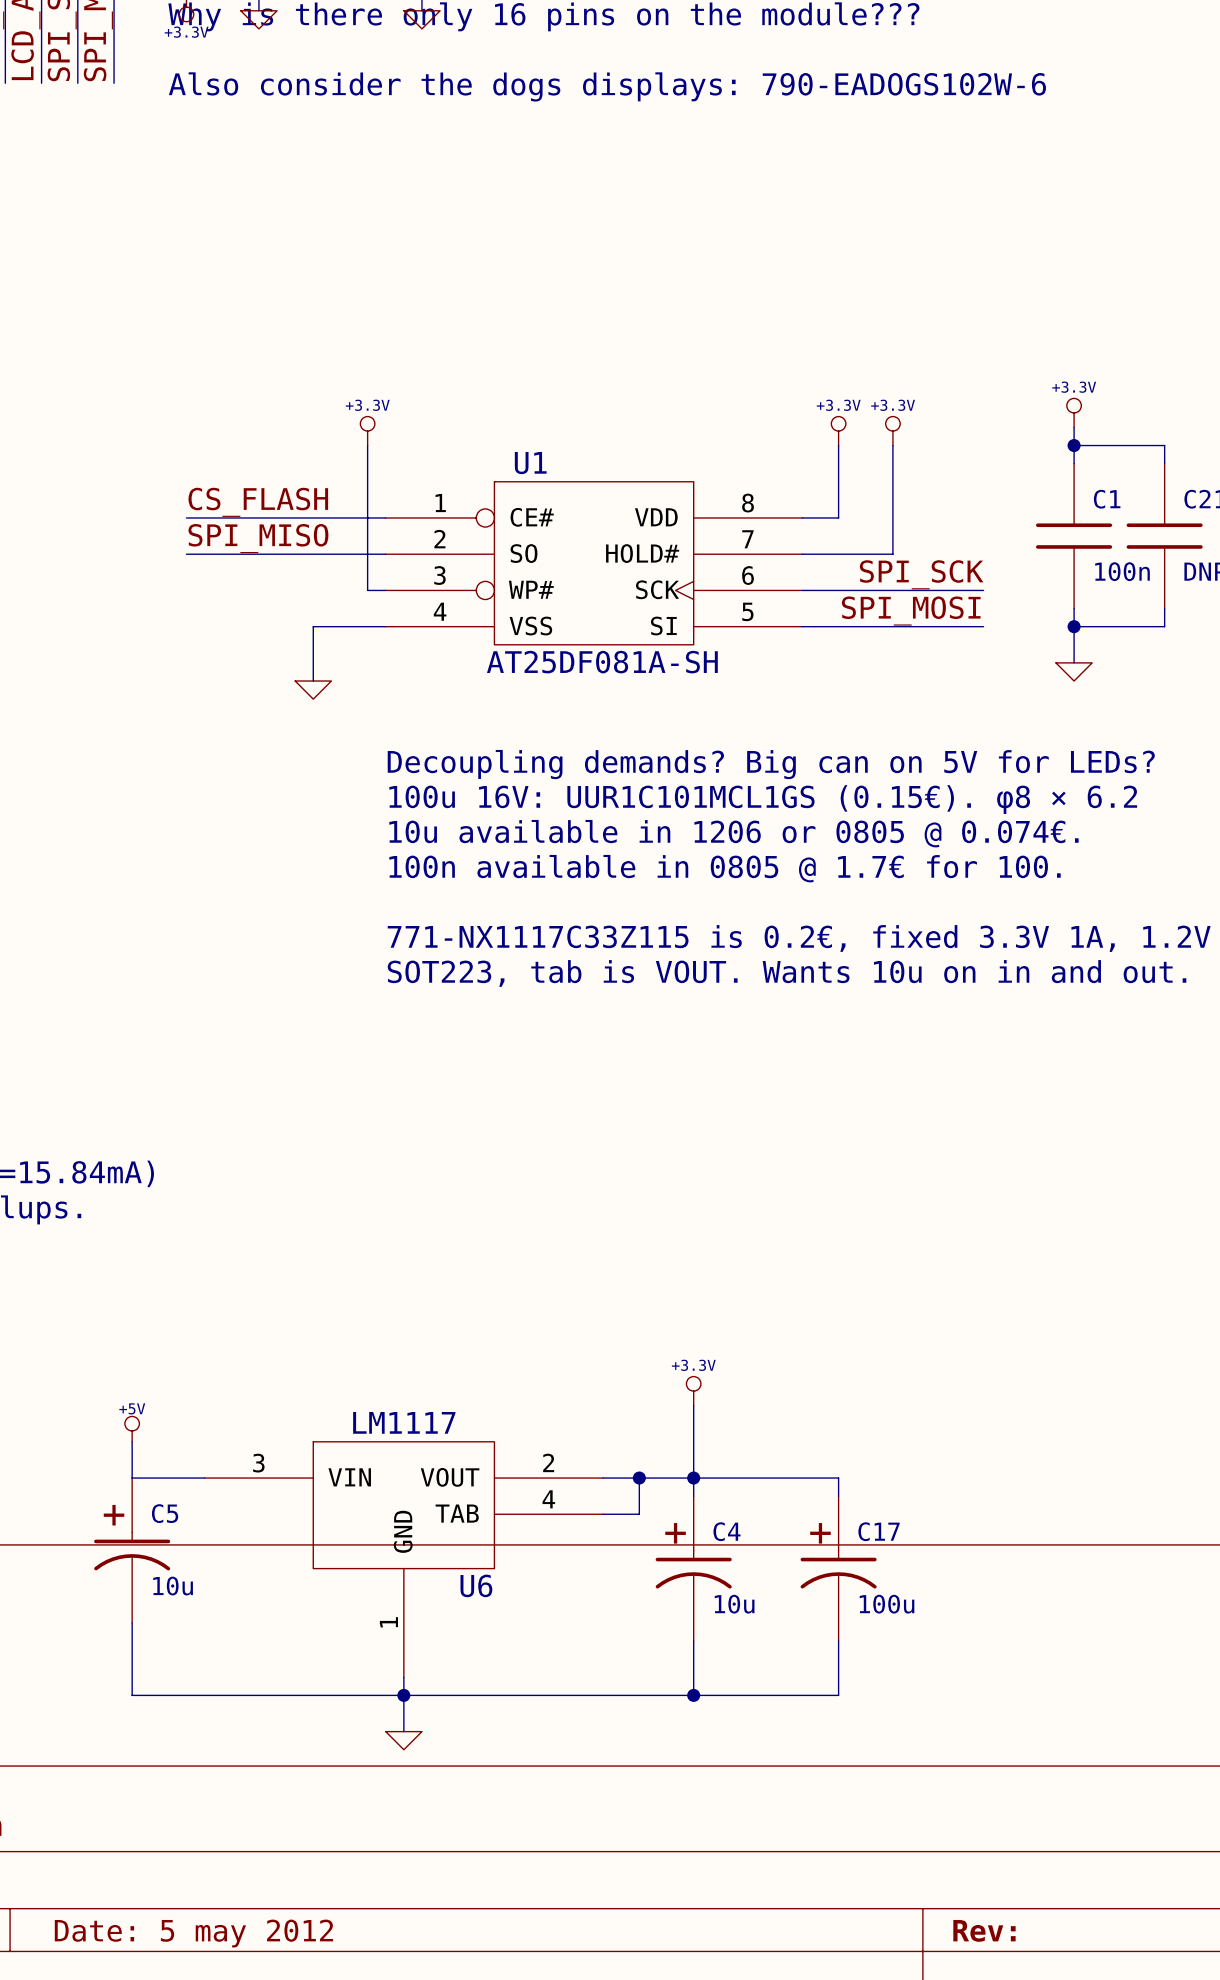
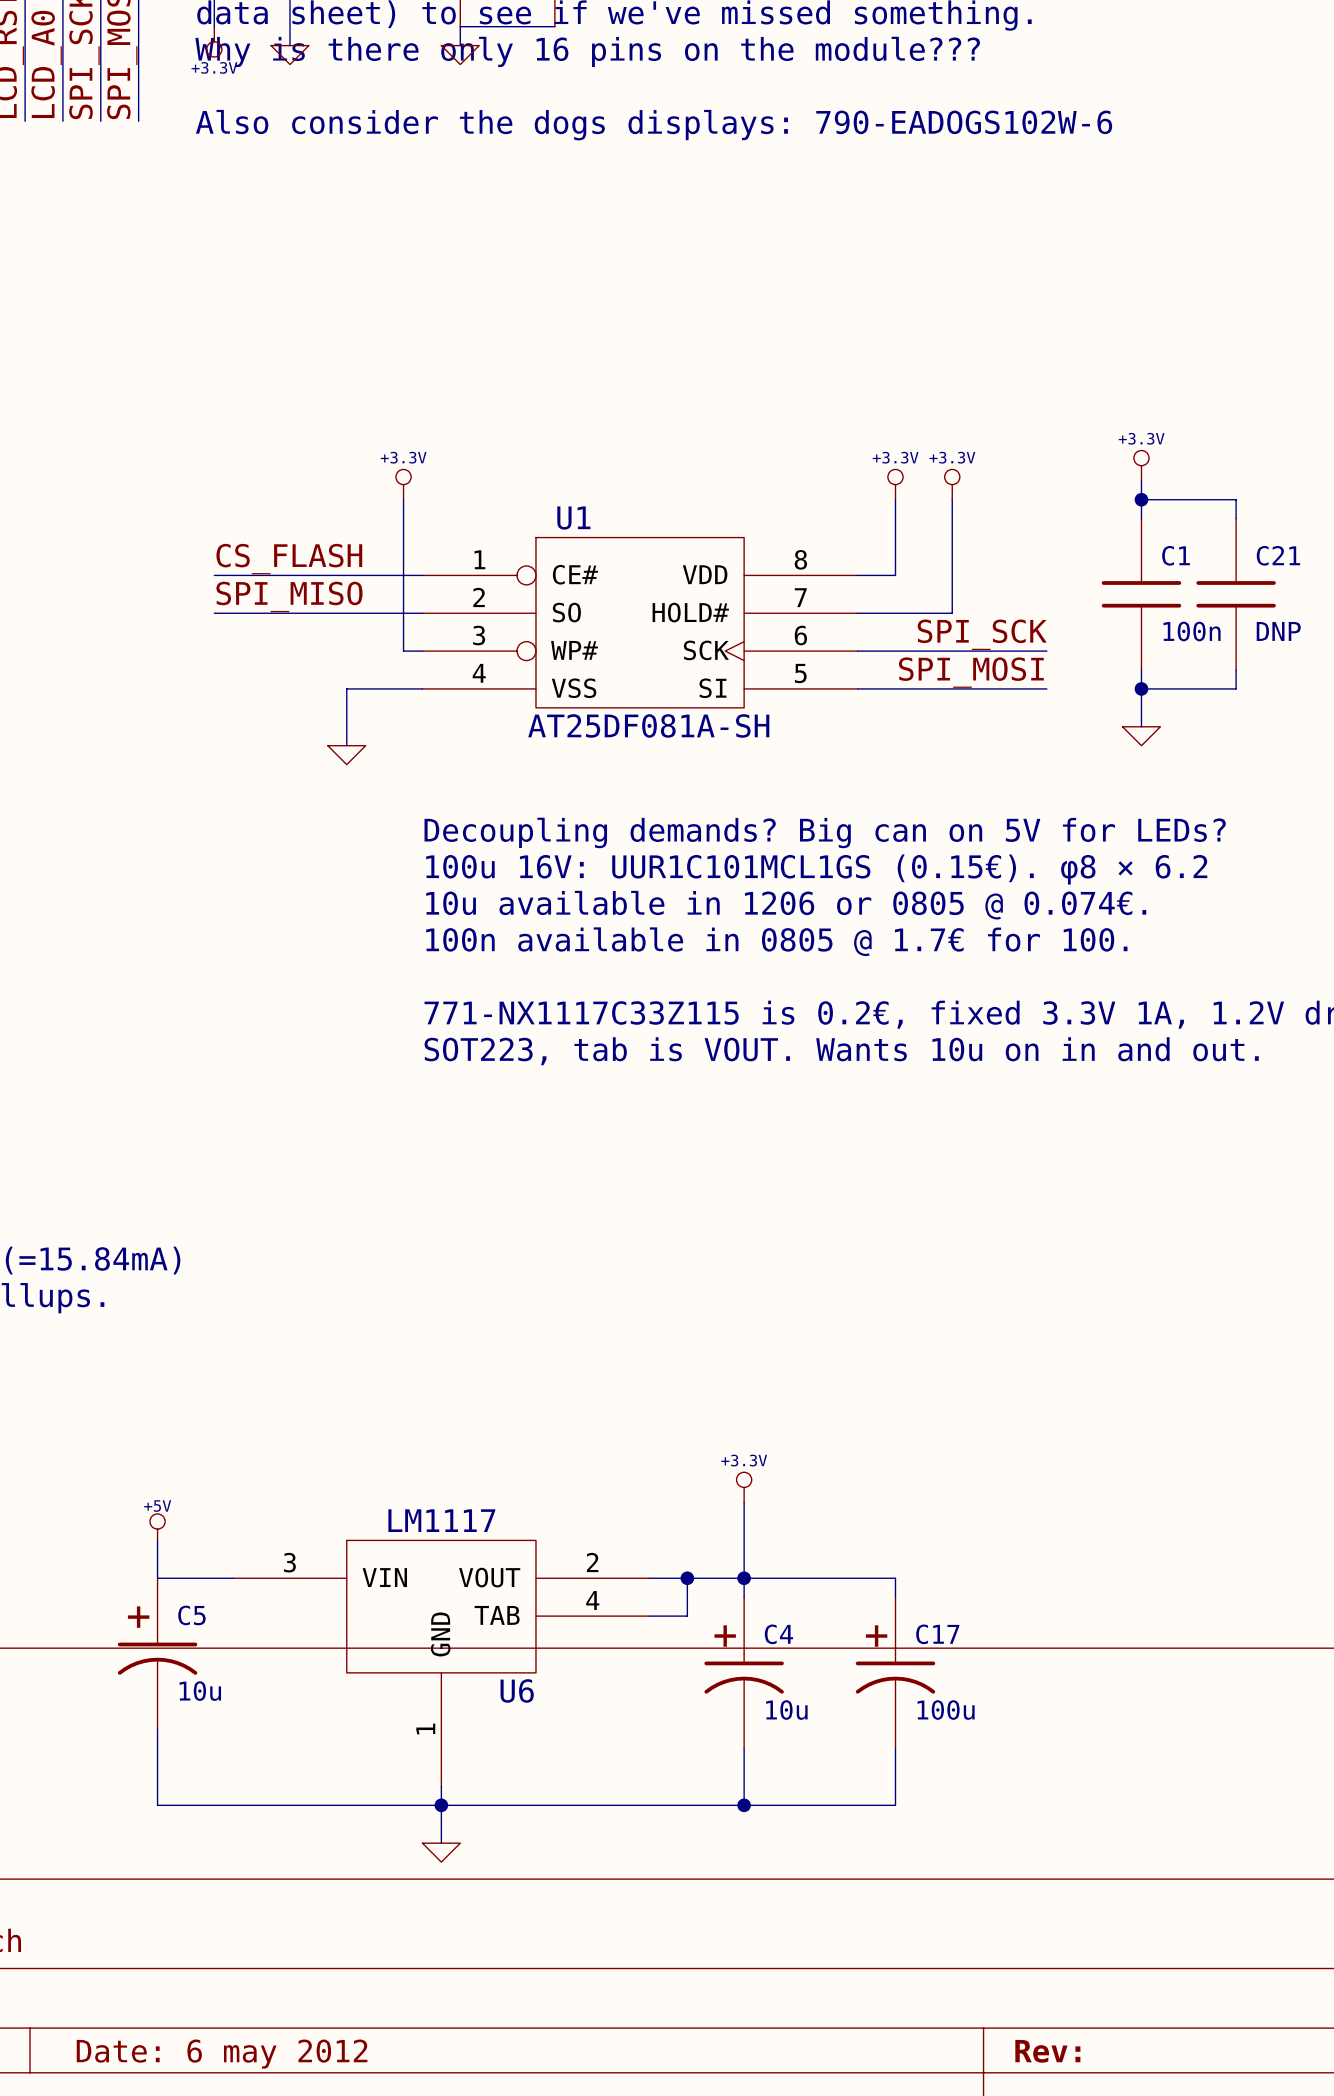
title block: Date: 5 may 2012 (193, 1933) -> Date: 6 may 2012 (222, 2054)

